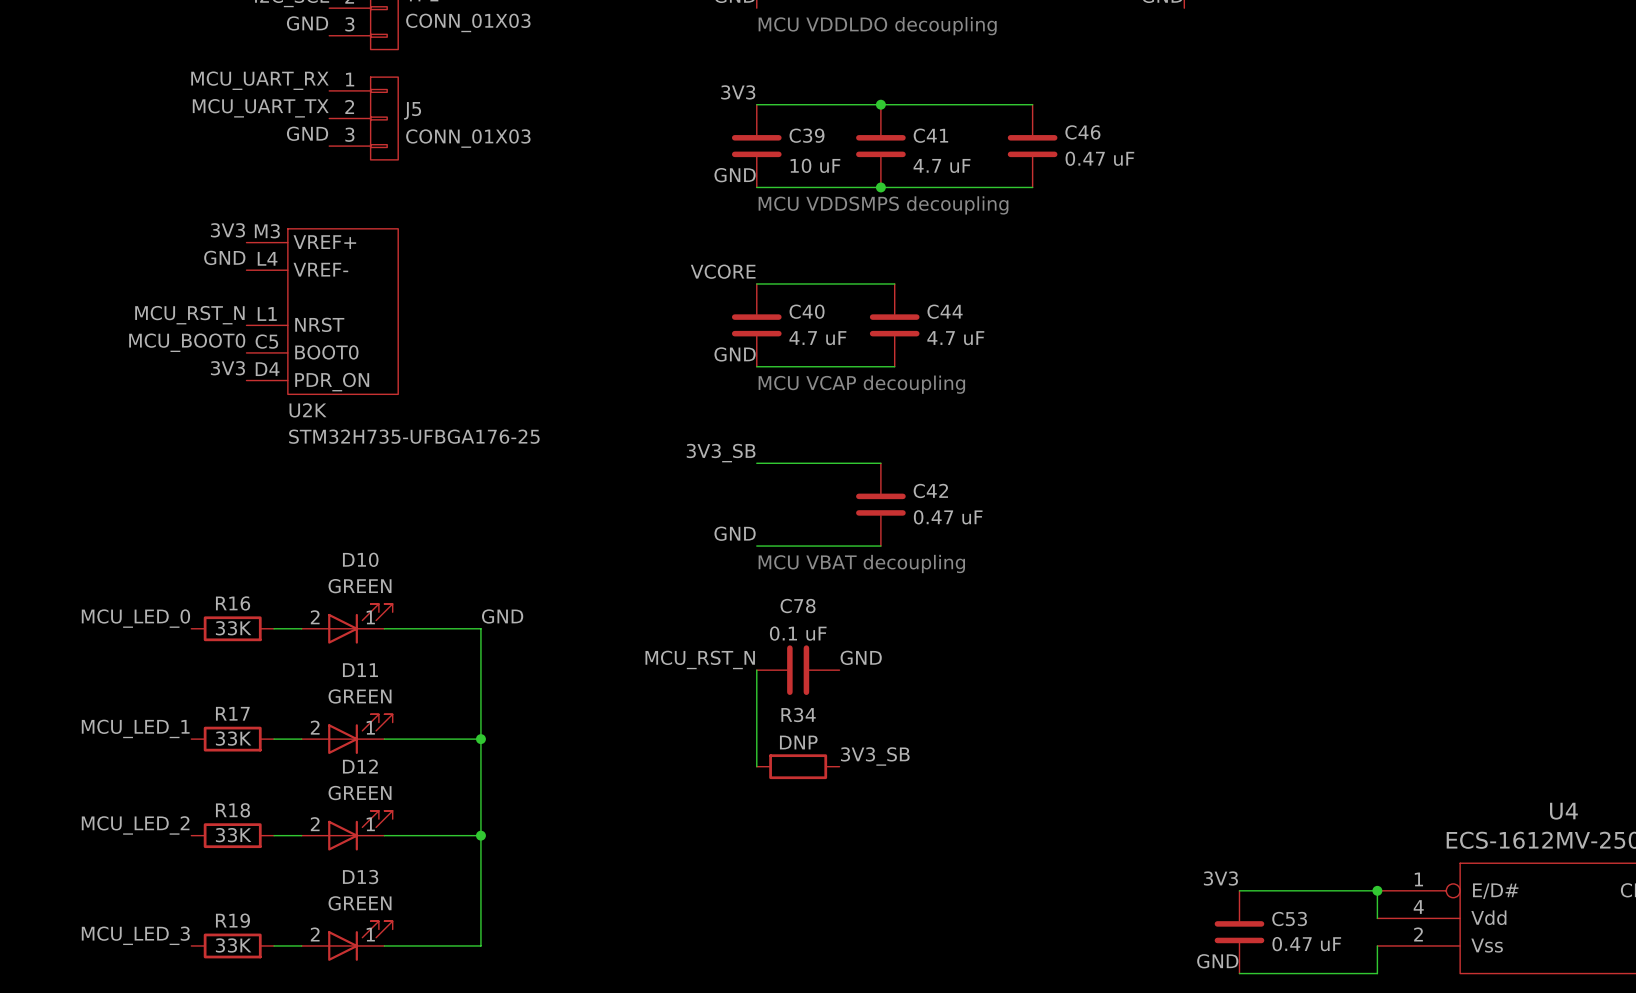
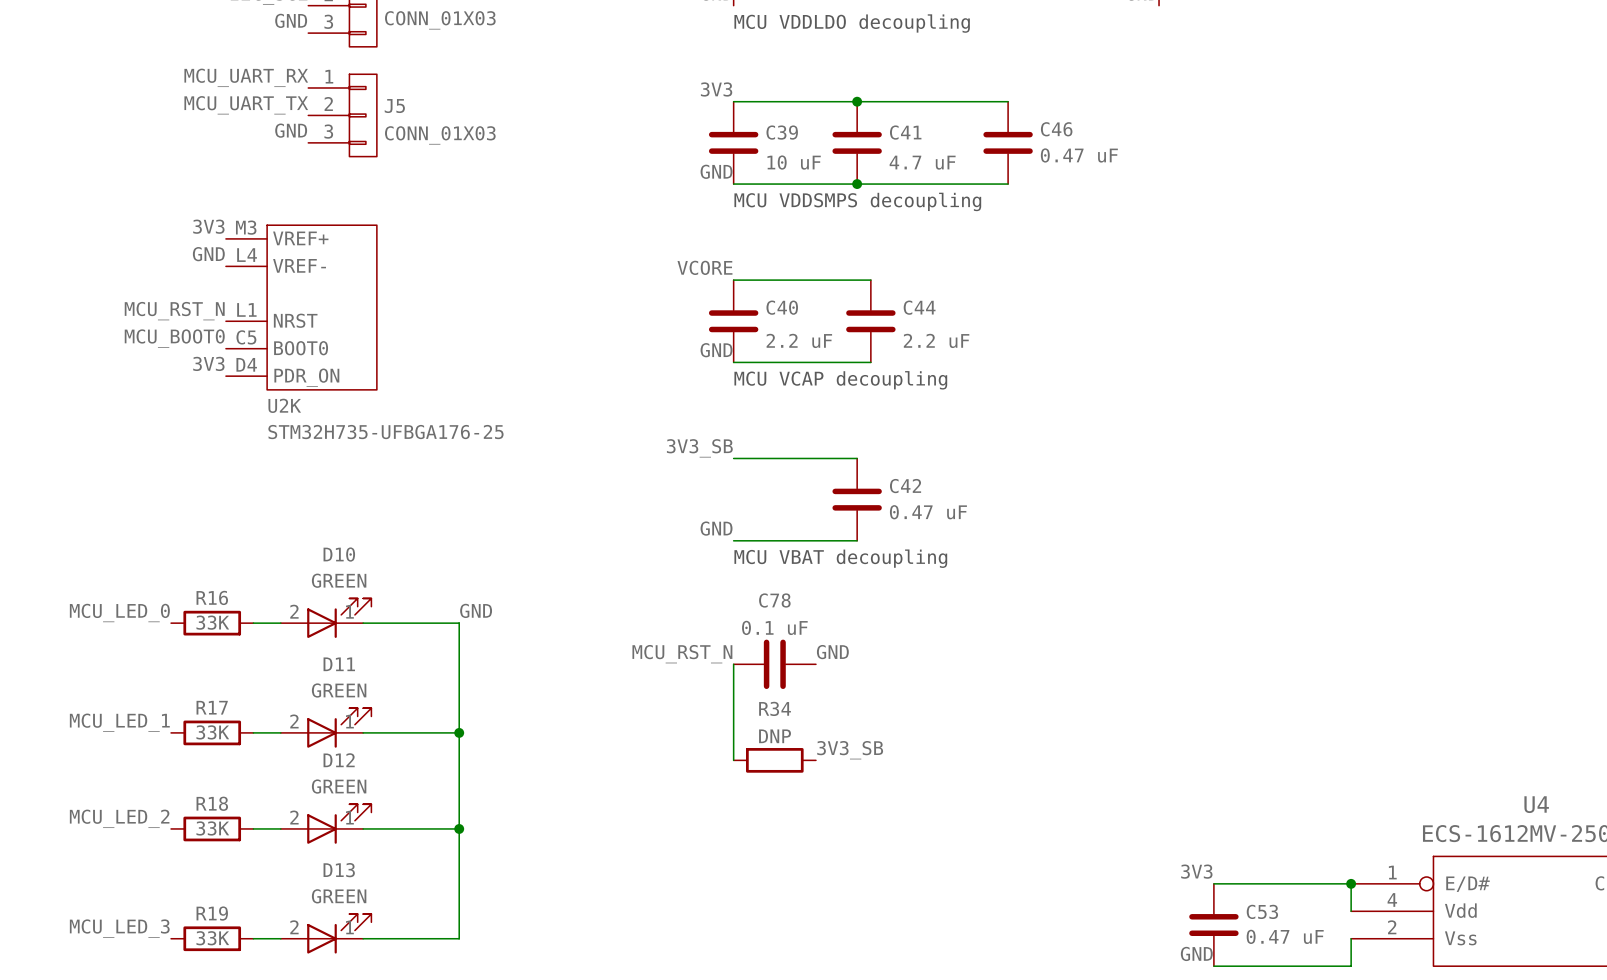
C40 value: 4.7 uF (817, 338) -> 2.2 uF (799, 340)
C44 value: 4.7 uF (955, 338) -> 2.2 uF (936, 340)

